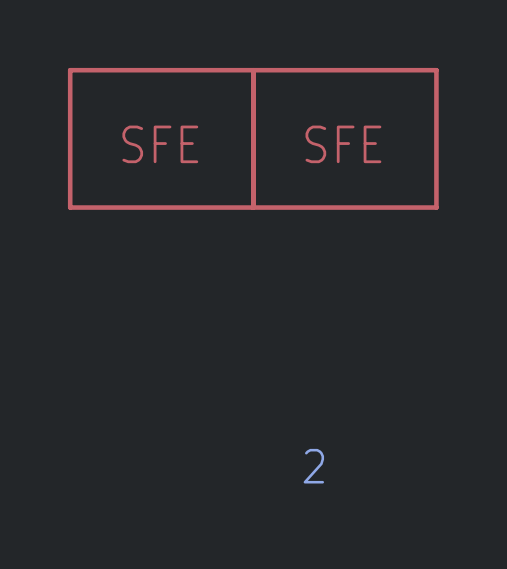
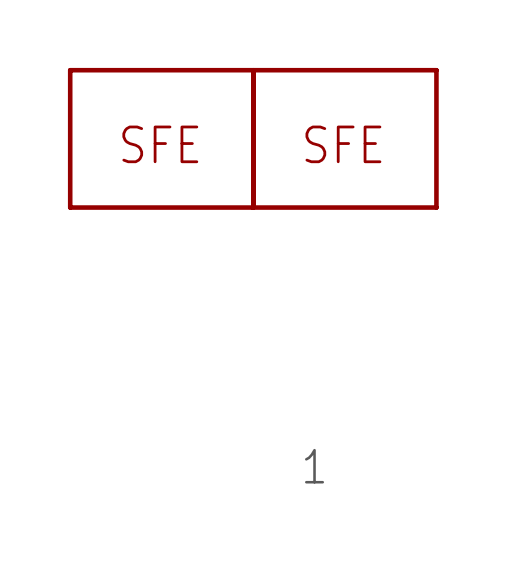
text: 2 (313, 466) -> 1 (314, 466)

